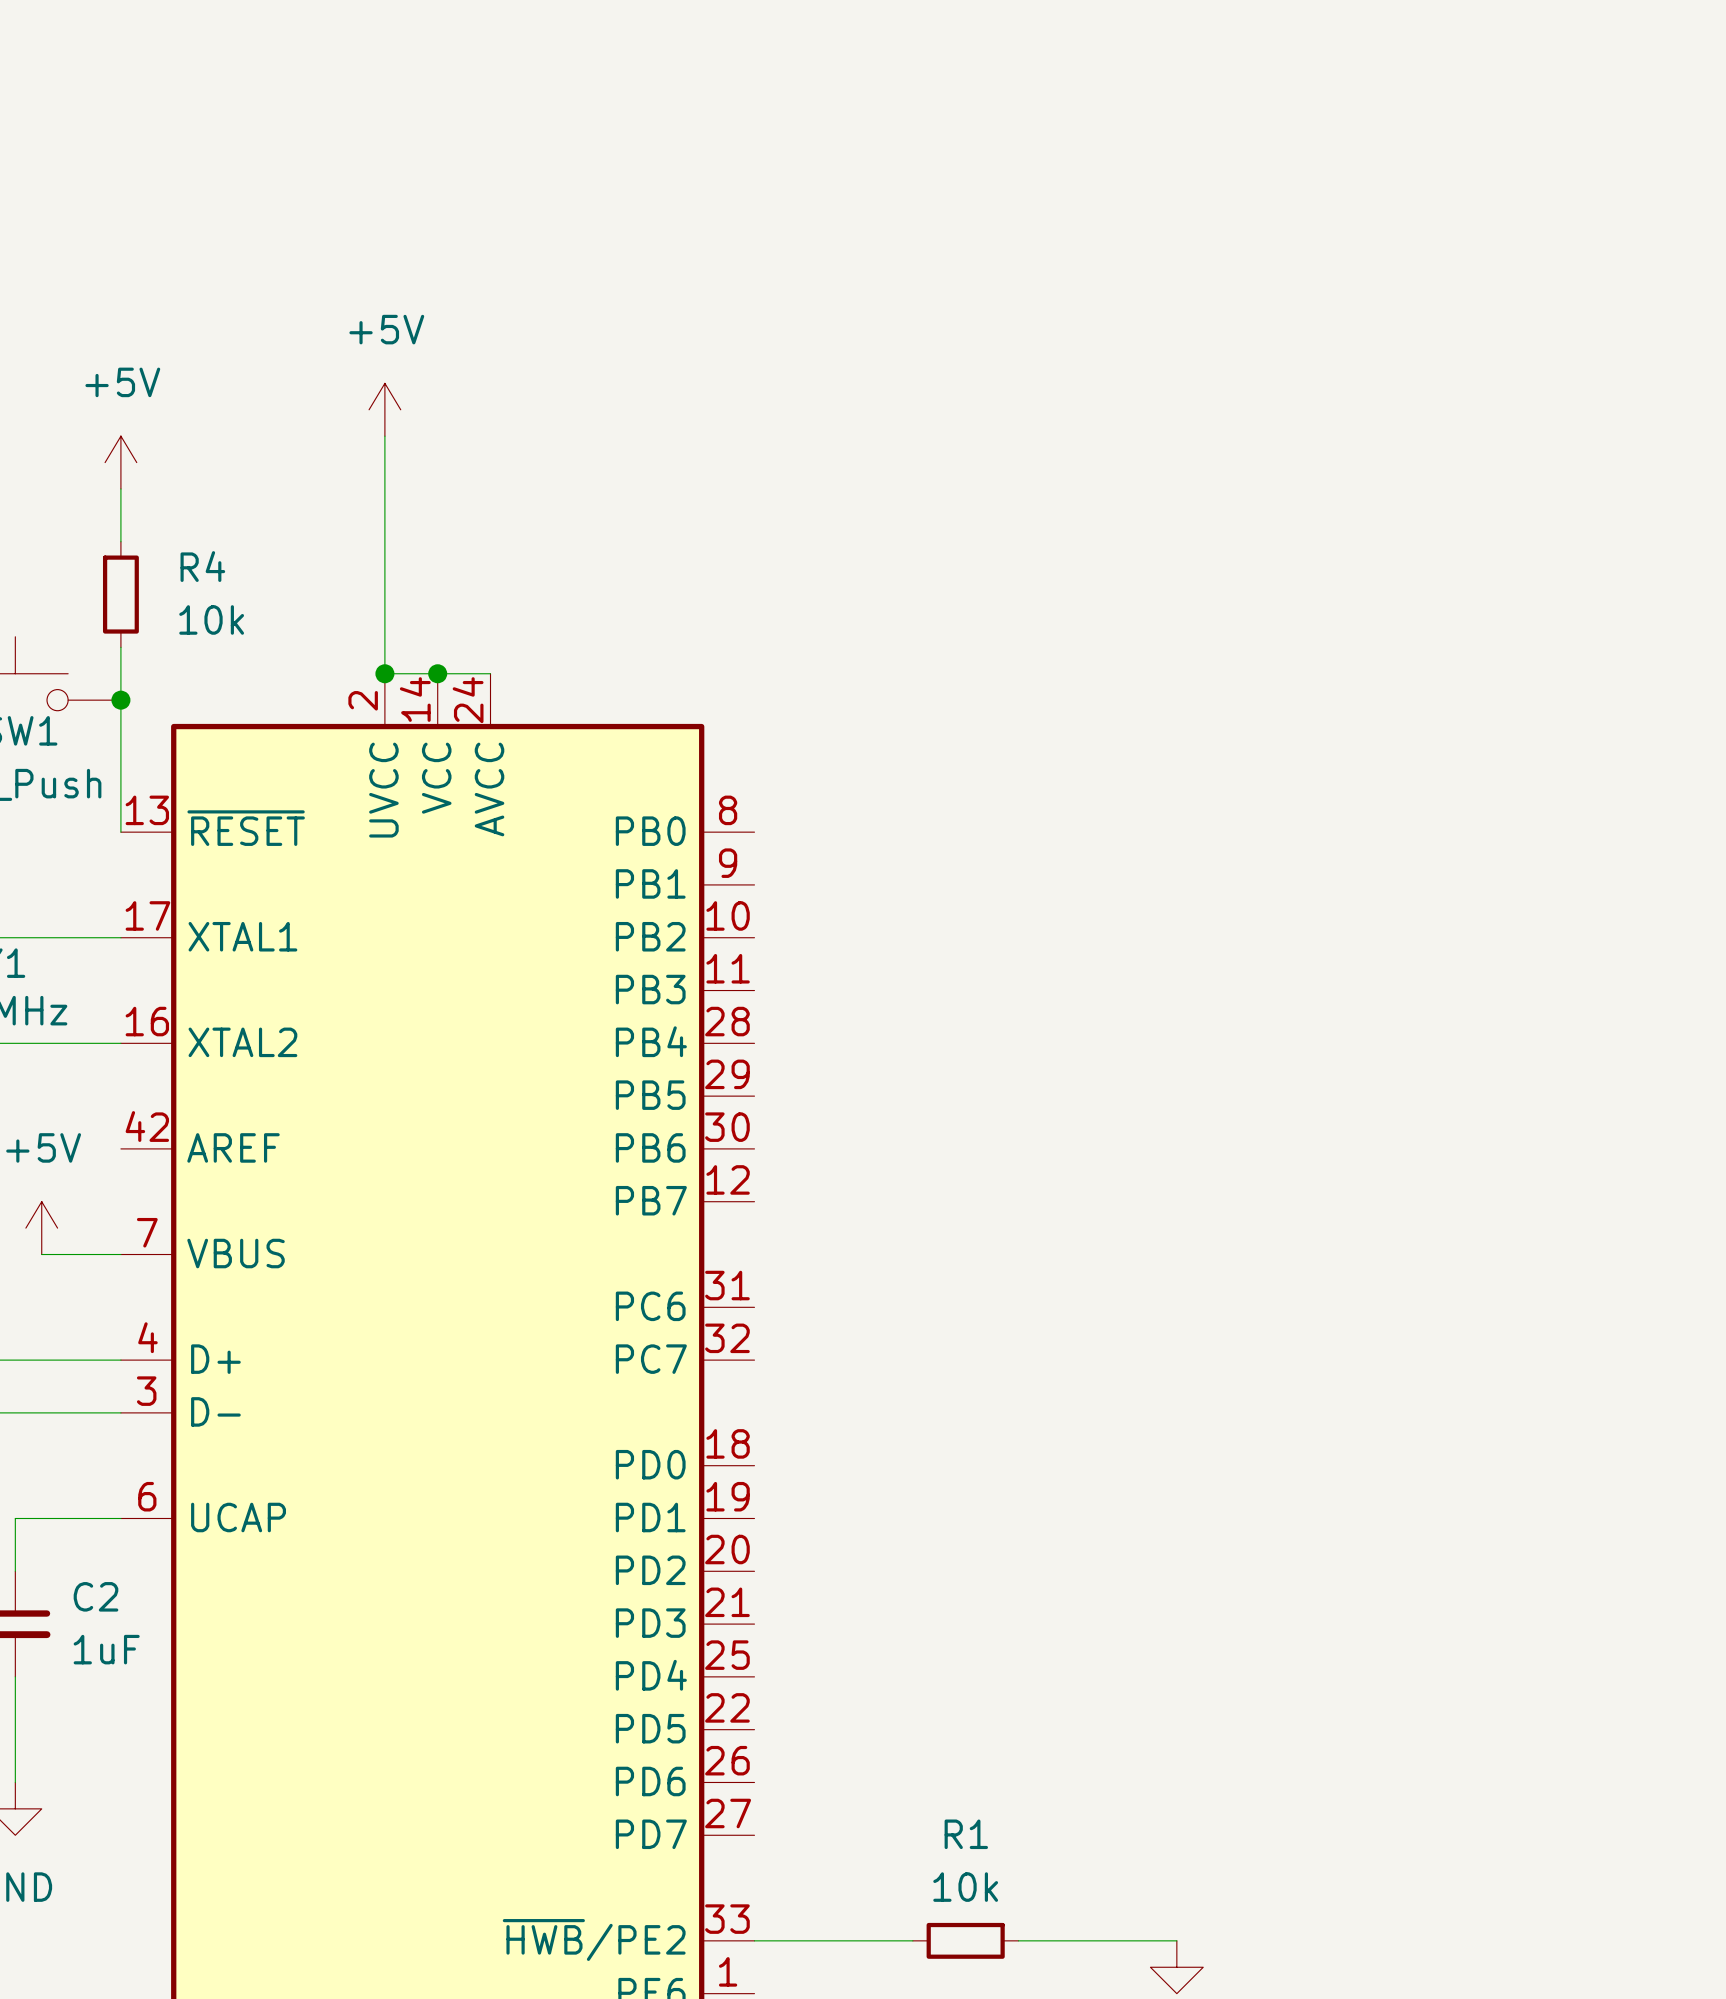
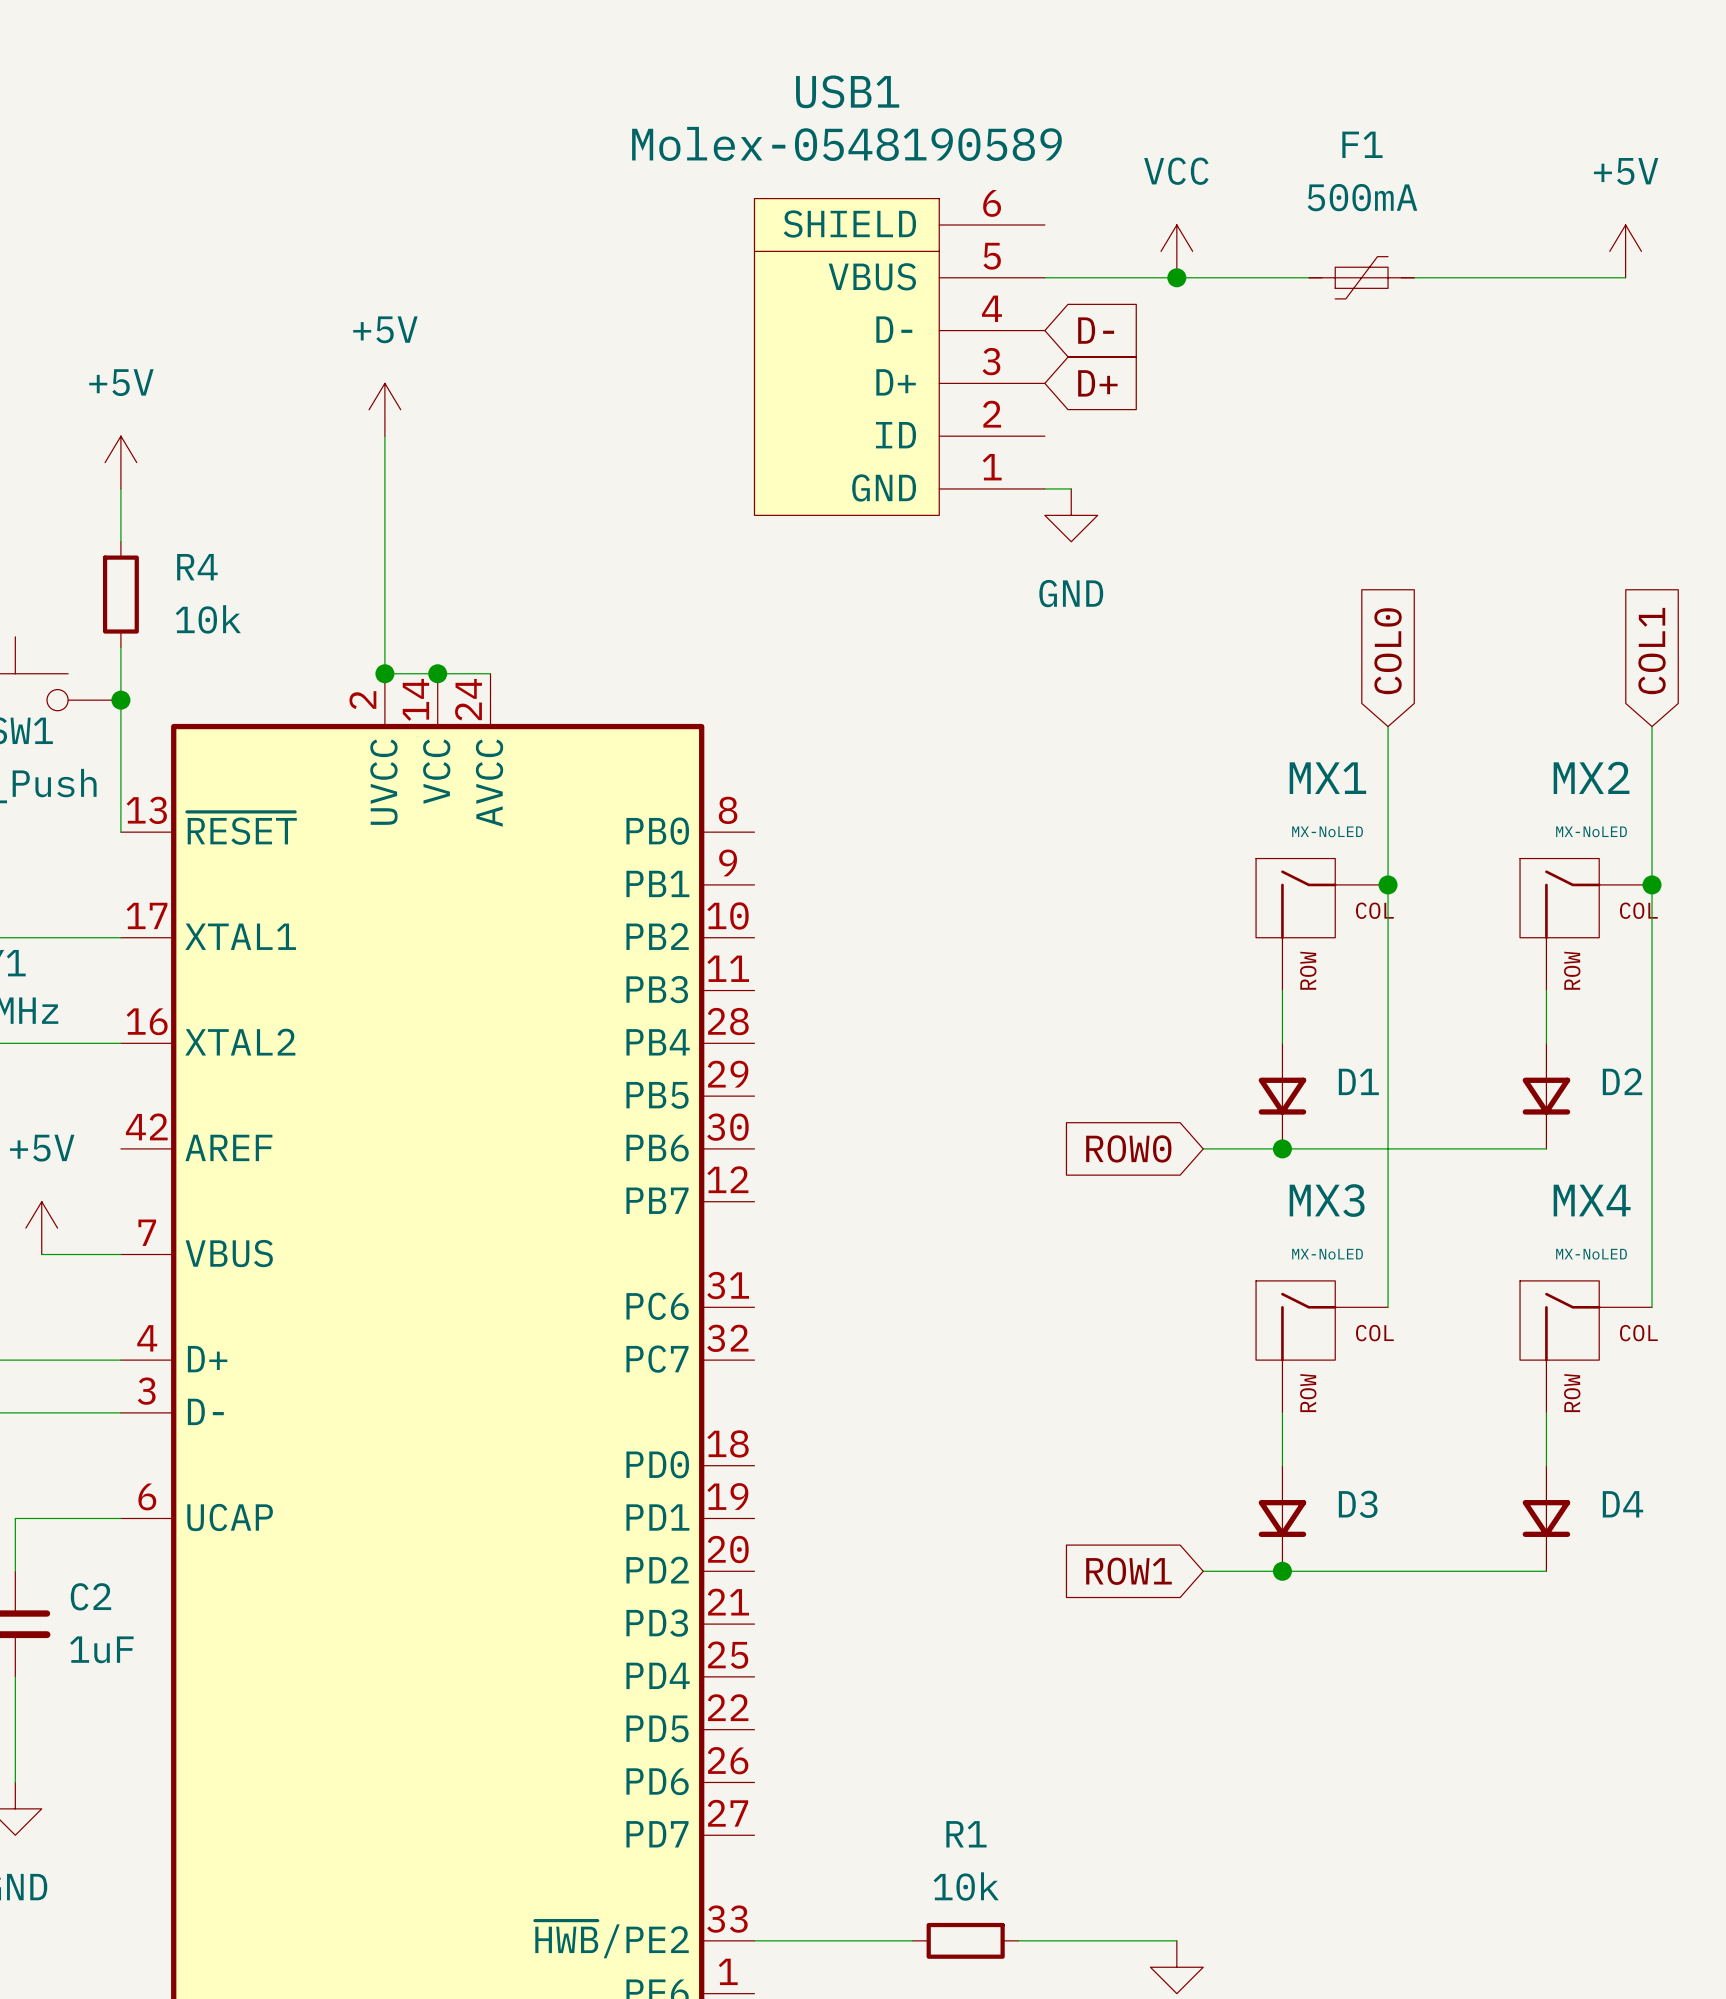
power symbol: none -> VCC (1176, 251)
power symbol: none -> +5V (1625, 251)
wire: none -> (1044, 277) (1308, 277)
junction: none -> (1176, 277)
F1: none -> 500mA (1361, 277)
wire: none -> (1414, 277) (1625, 277)
global label: none -> D- (1096, 330)
USB1: none -> Molex-0548190589 (899, 356)
global label: none -> D+ (1097, 383)
wire: none -> (1044, 488) (1071, 488)
power symbol: none -> GND (1071, 515)
global label: none -> COL0 (1388, 651)
global label: none -> COL1 (1652, 651)
wire: none -> (1388, 726) (1388, 1307)
wire: none -> (1652, 726) (1652, 1307)
junction: none -> (1388, 884)
junction: none -> (1652, 884)
MX1: none -> MX-NoLED (1322, 924)
MX2: none -> MX-NoLED (1586, 924)
wire: none -> (1282, 990) (1282, 1043)
wire: none -> (1546, 990) (1546, 1043)
D1: none -> (1282, 1096)
D2: none -> (1546, 1096)
global label: none -> ROW0 (1128, 1148)
wire: none -> (1203, 1148) (1546, 1148)
junction: none -> (1282, 1148)
MX3: none -> MX-NoLED (1322, 1346)
MX4: none -> MX-NoLED (1586, 1346)
wire: none -> (1282, 1412) (1282, 1465)
wire: none -> (1546, 1412) (1546, 1465)
D3: none -> (1282, 1518)
D4: none -> (1546, 1518)
global label: none -> ROW1 (1128, 1571)
wire: none -> (1203, 1571) (1546, 1571)
junction: none -> (1282, 1571)

